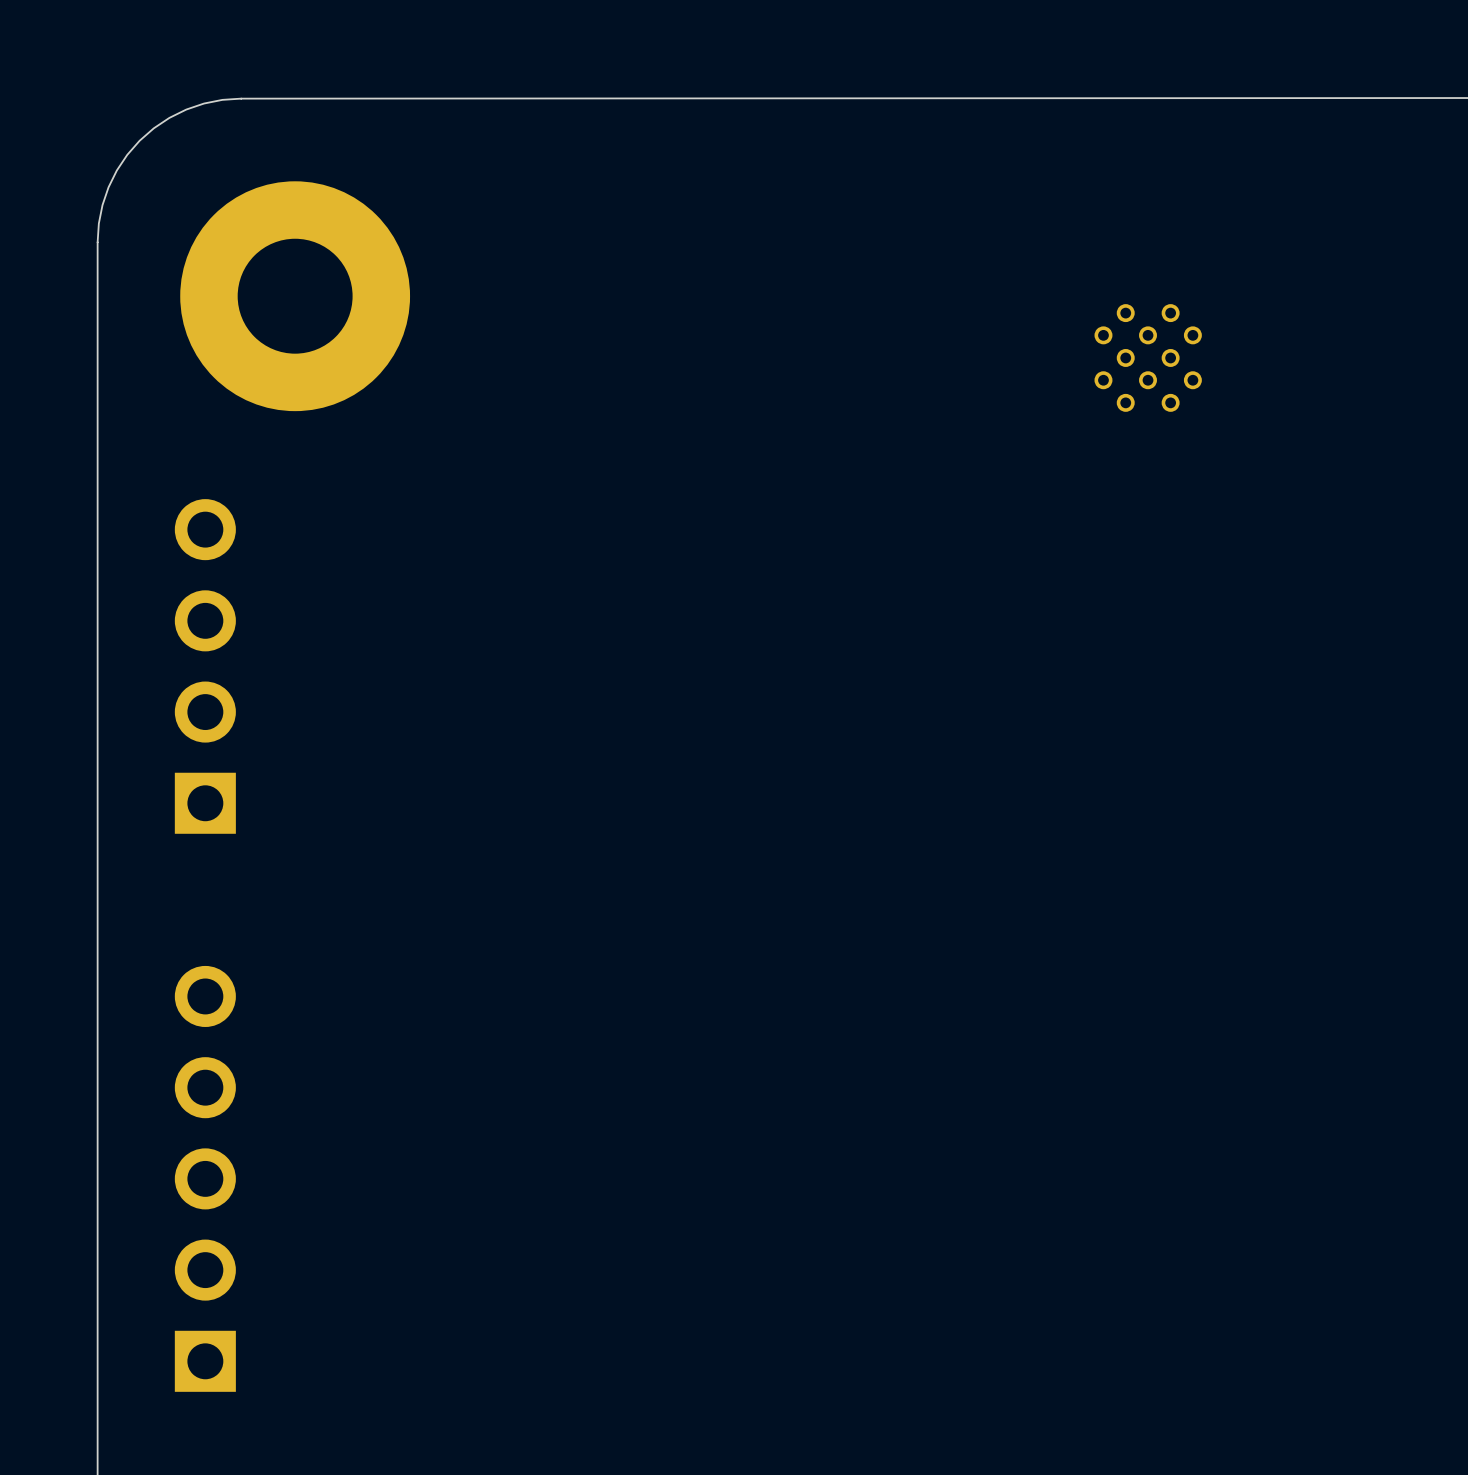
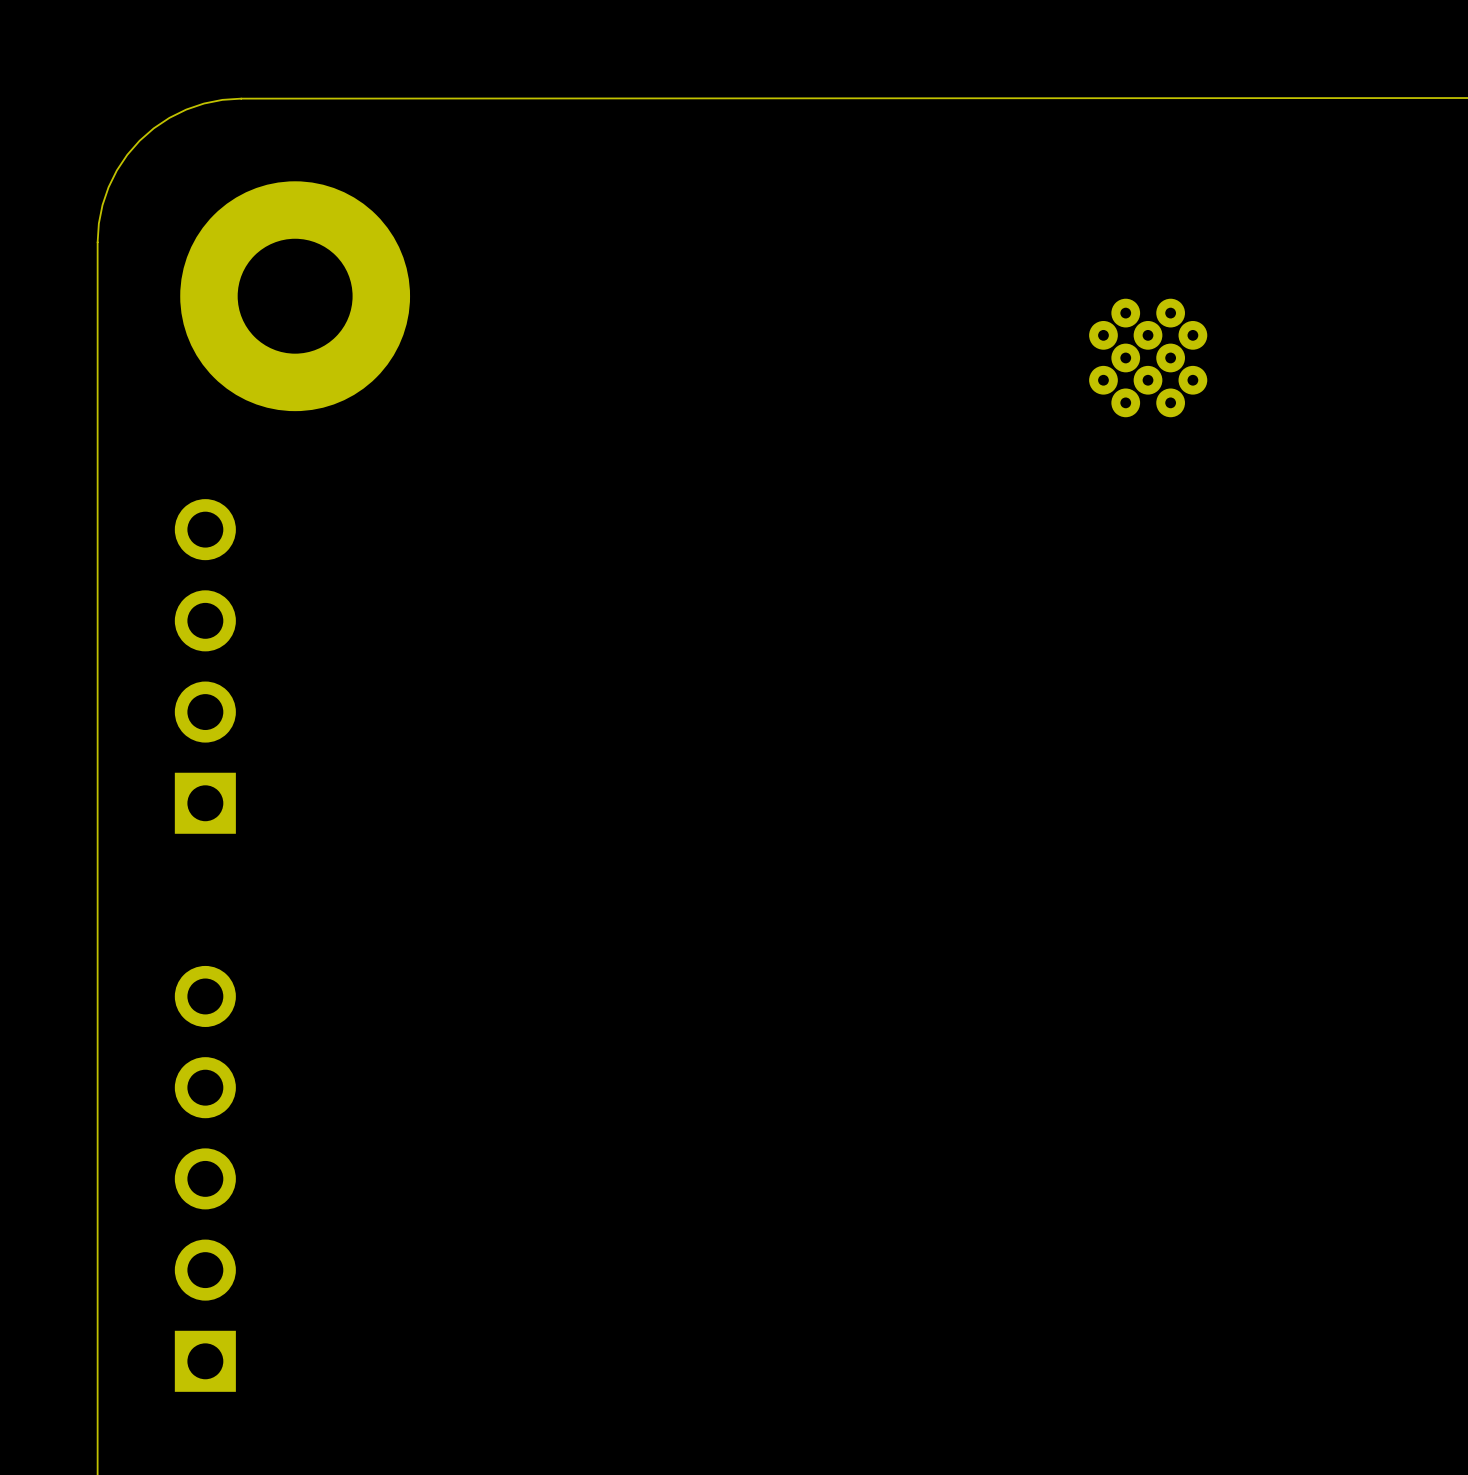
part footprint: [1094, 304, 1202, 412] -> [1089, 298, 1208, 418]

